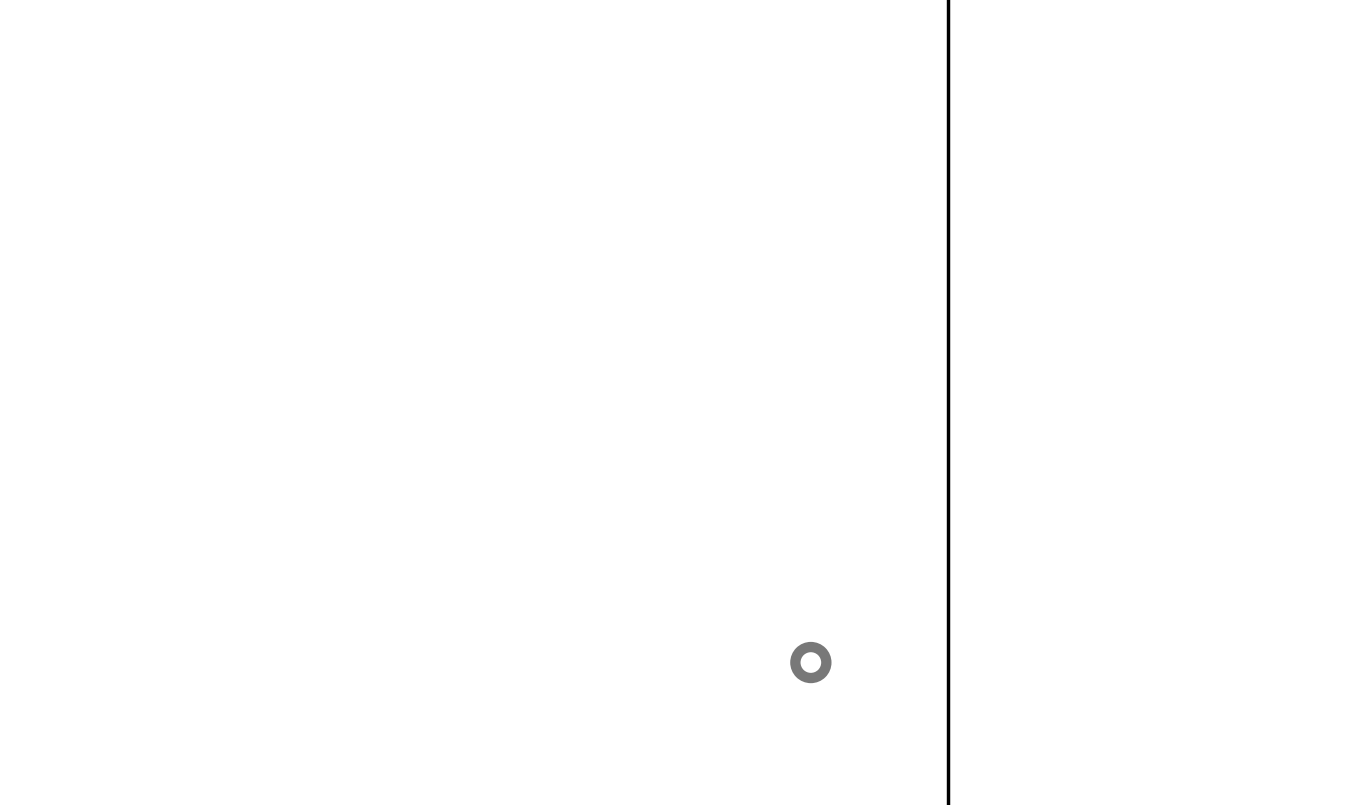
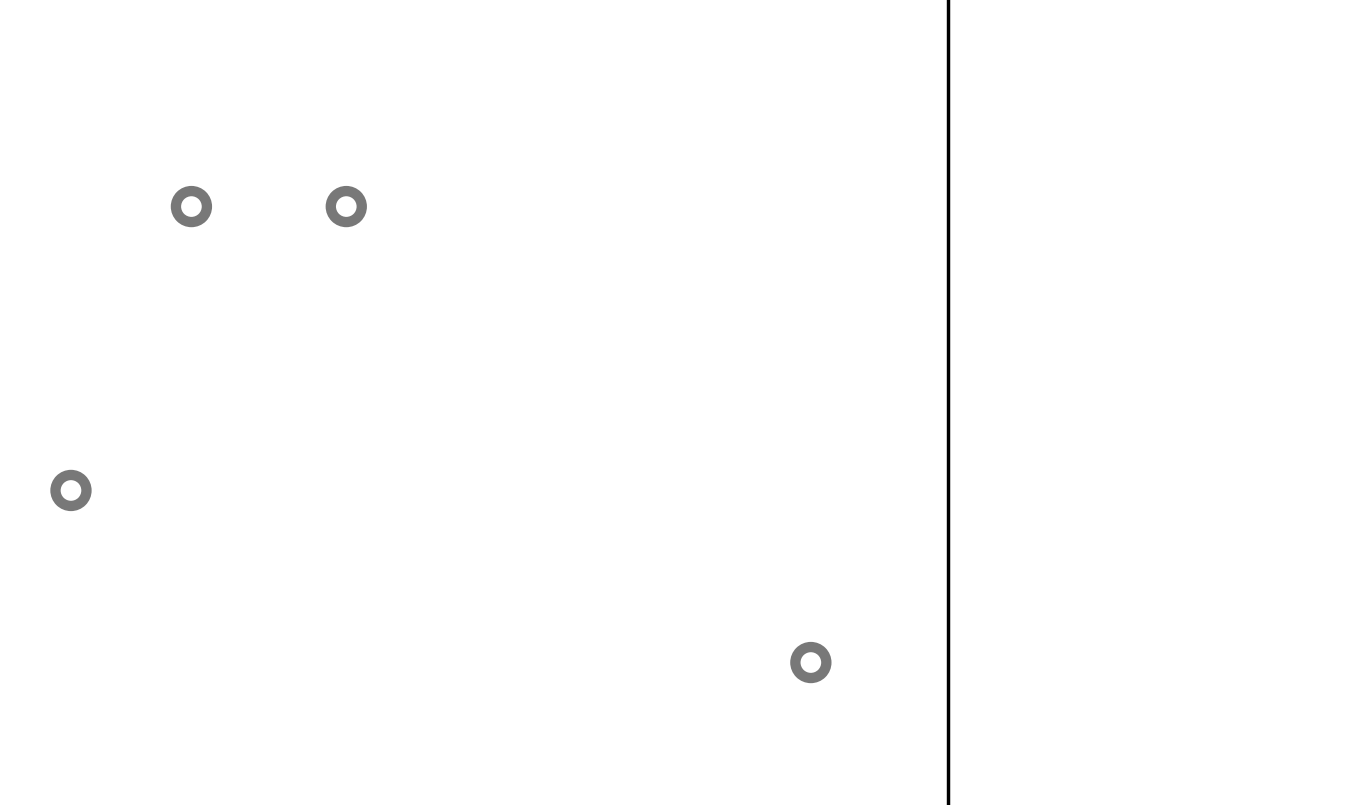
via: none -> (191, 206)
via: none -> (346, 206)
via: none -> (70, 490)

